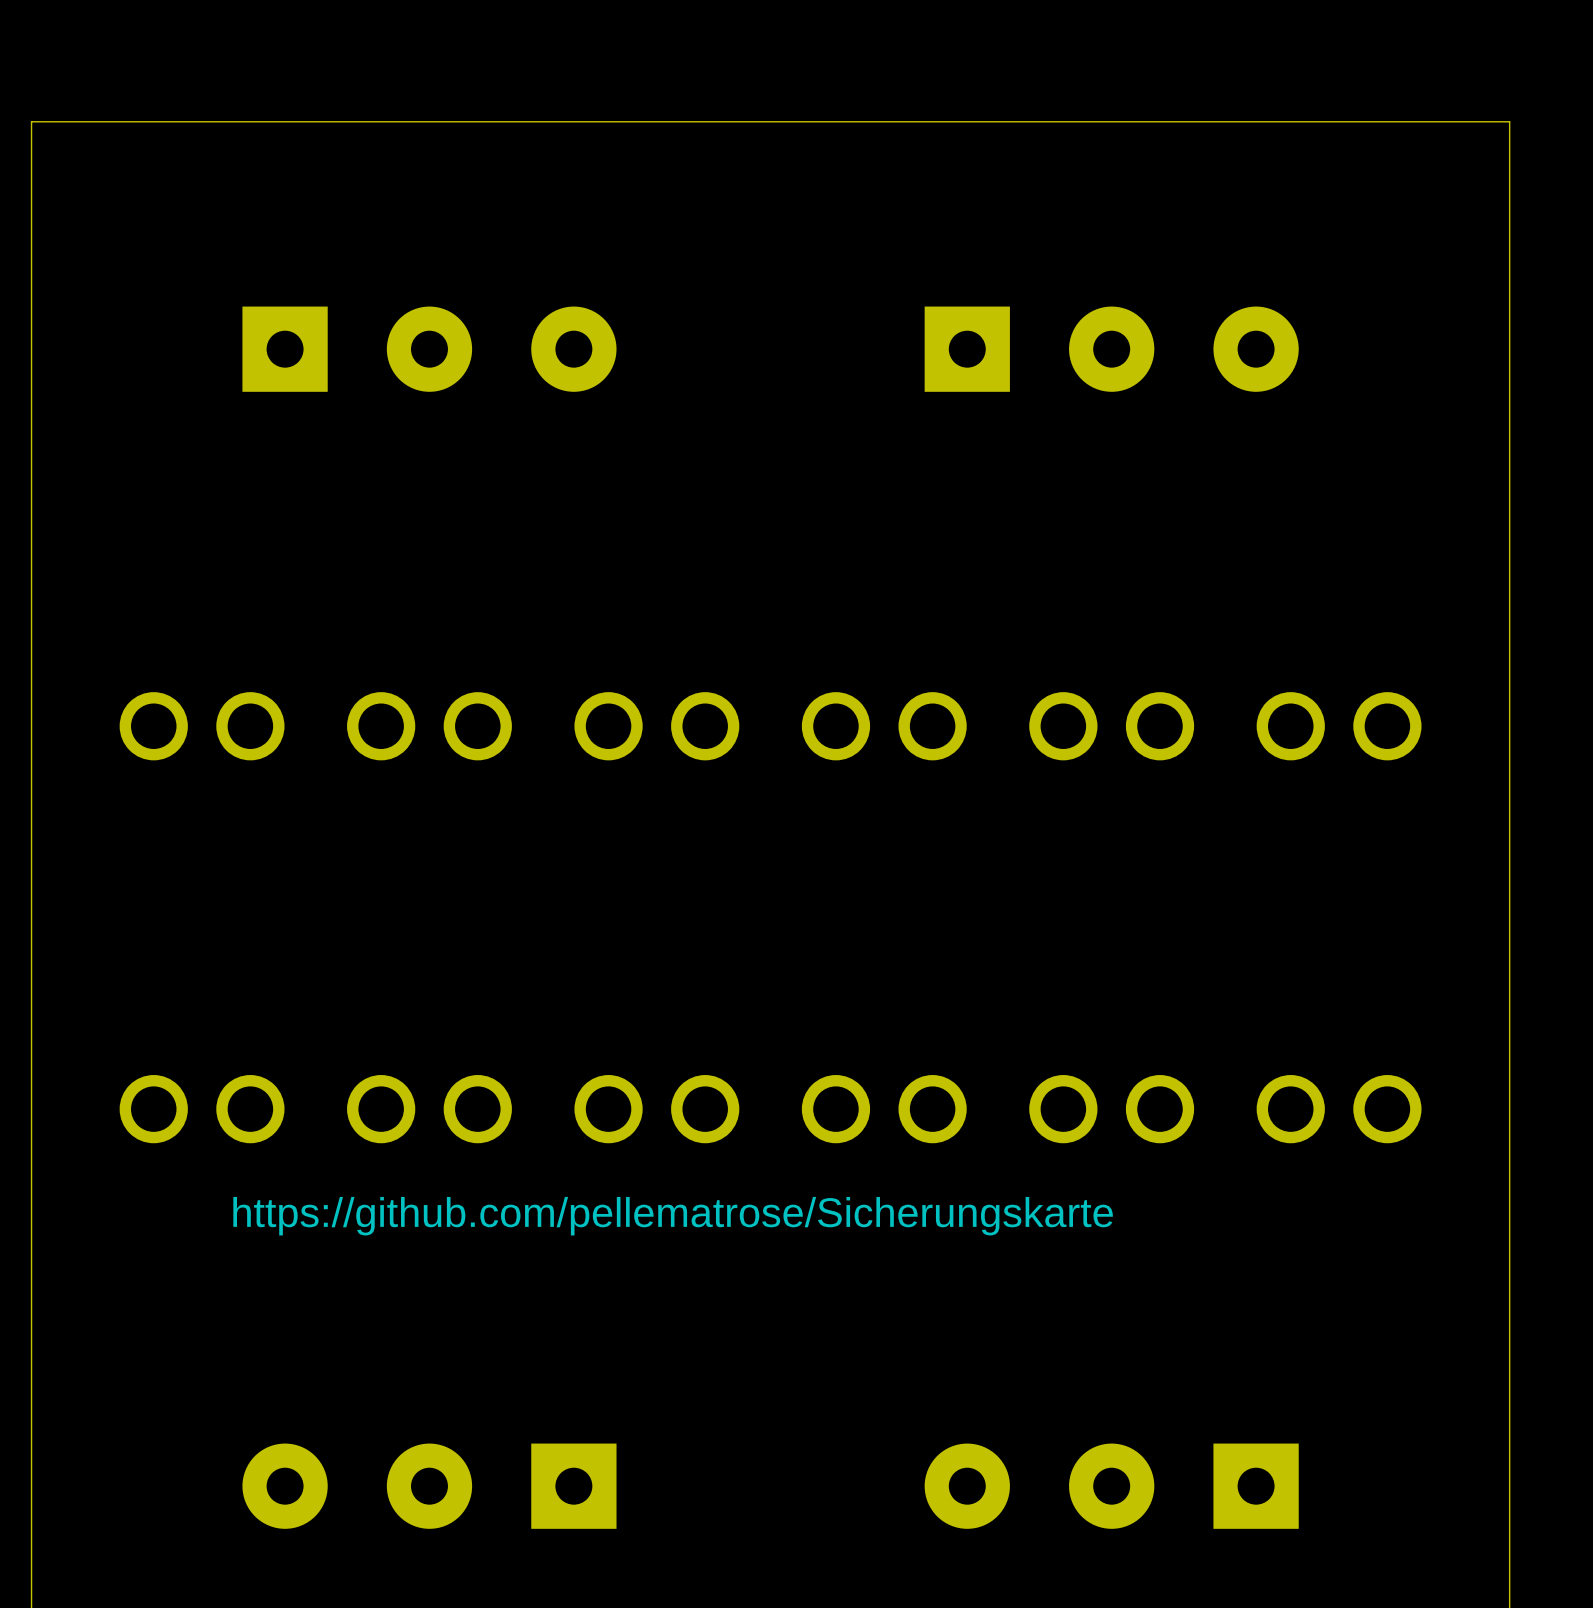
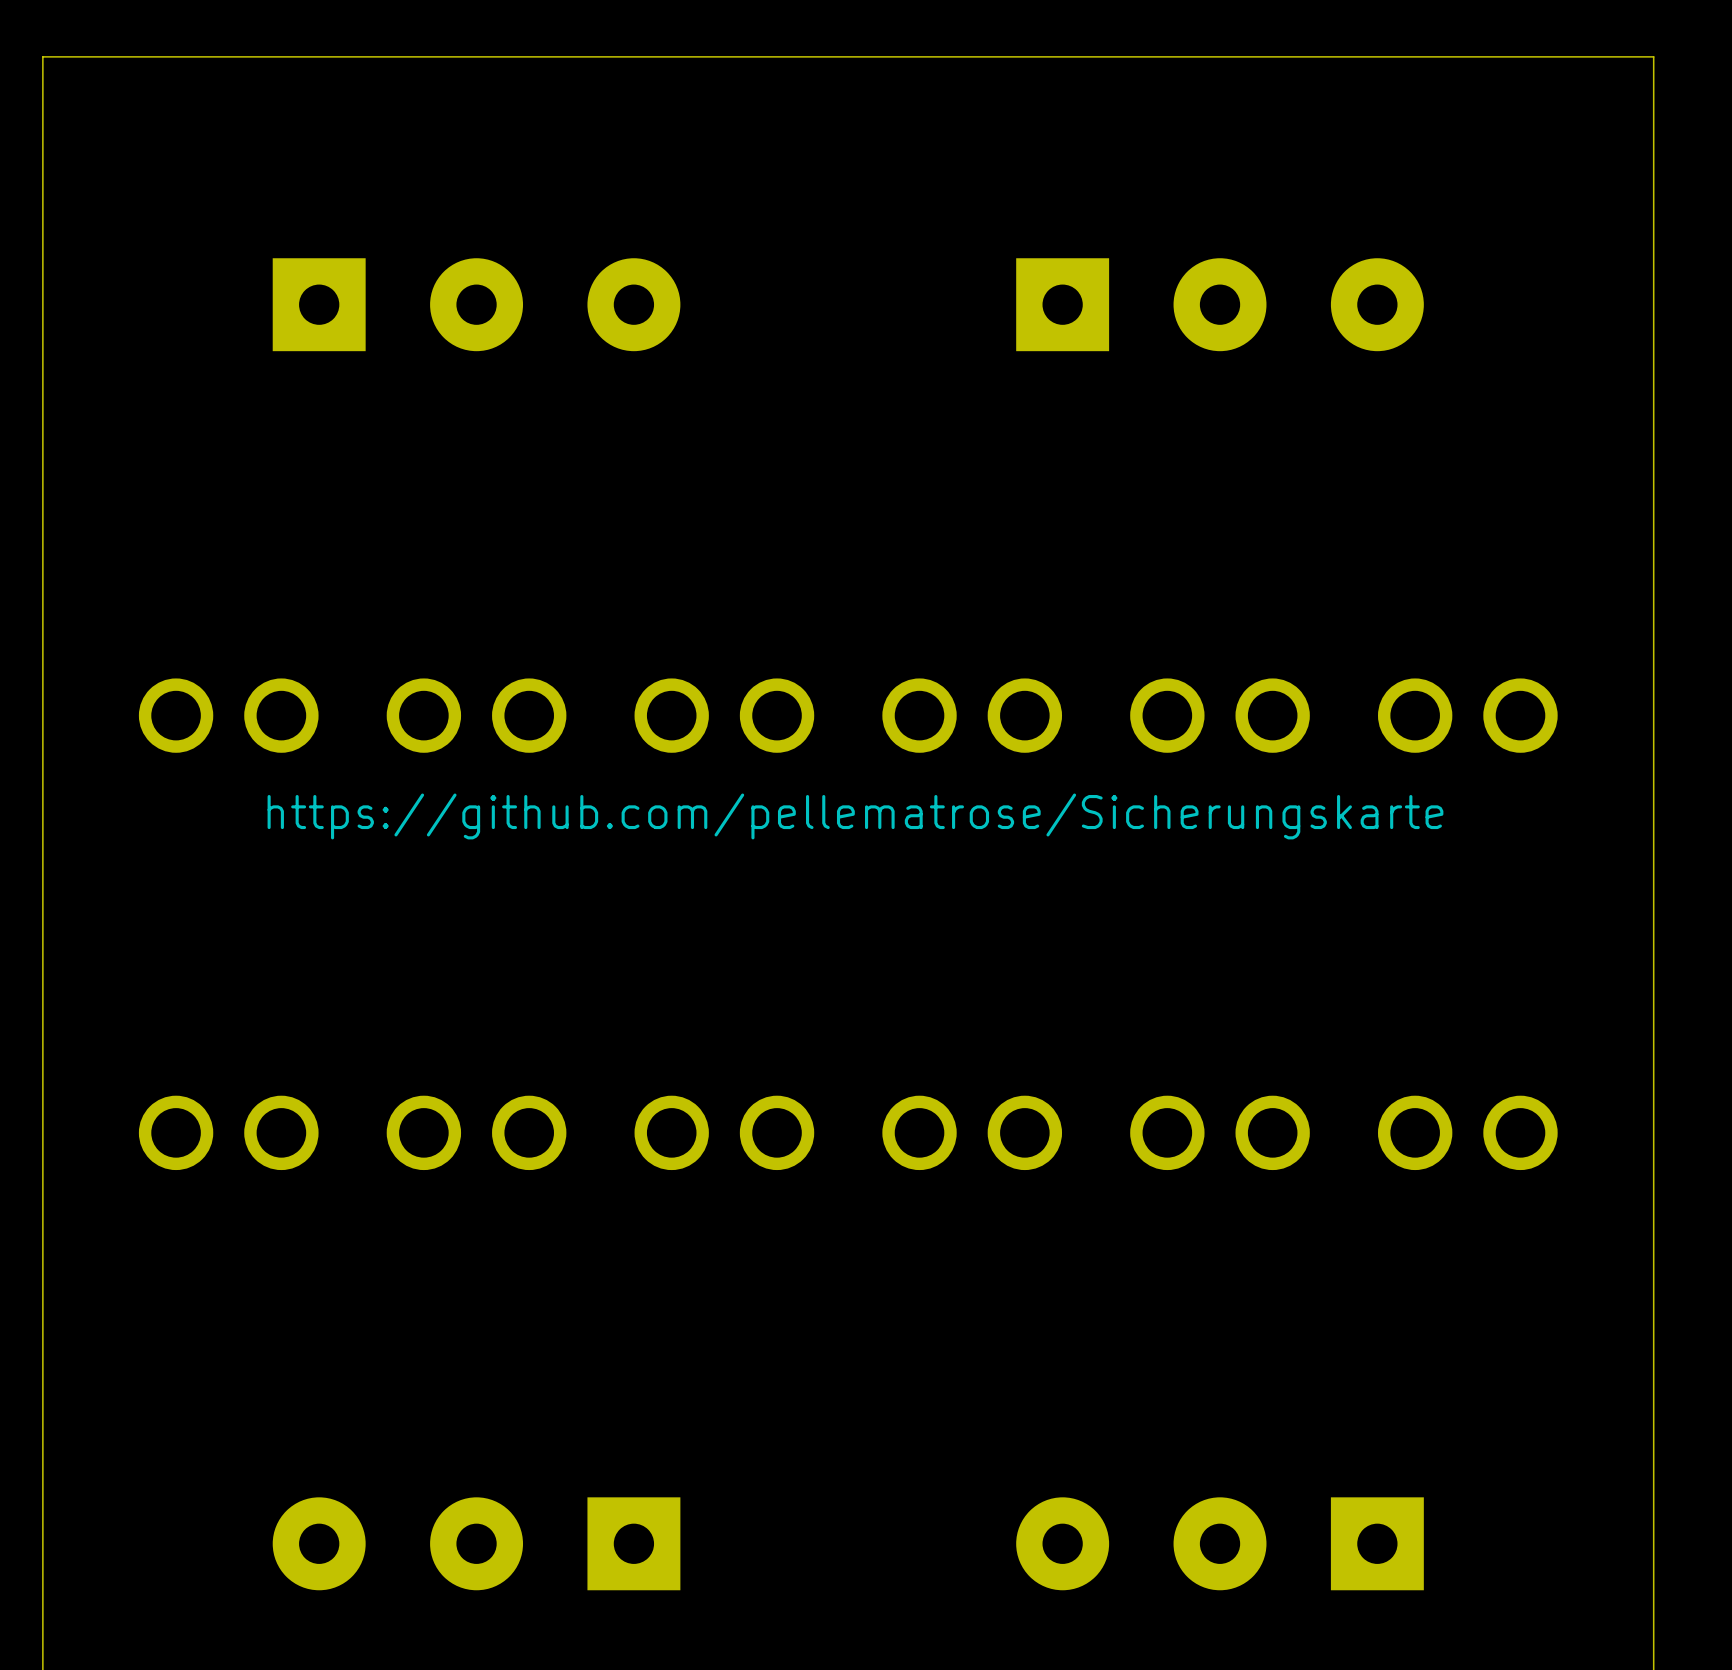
drawing position: (673, 1216) -> (855, 816)

